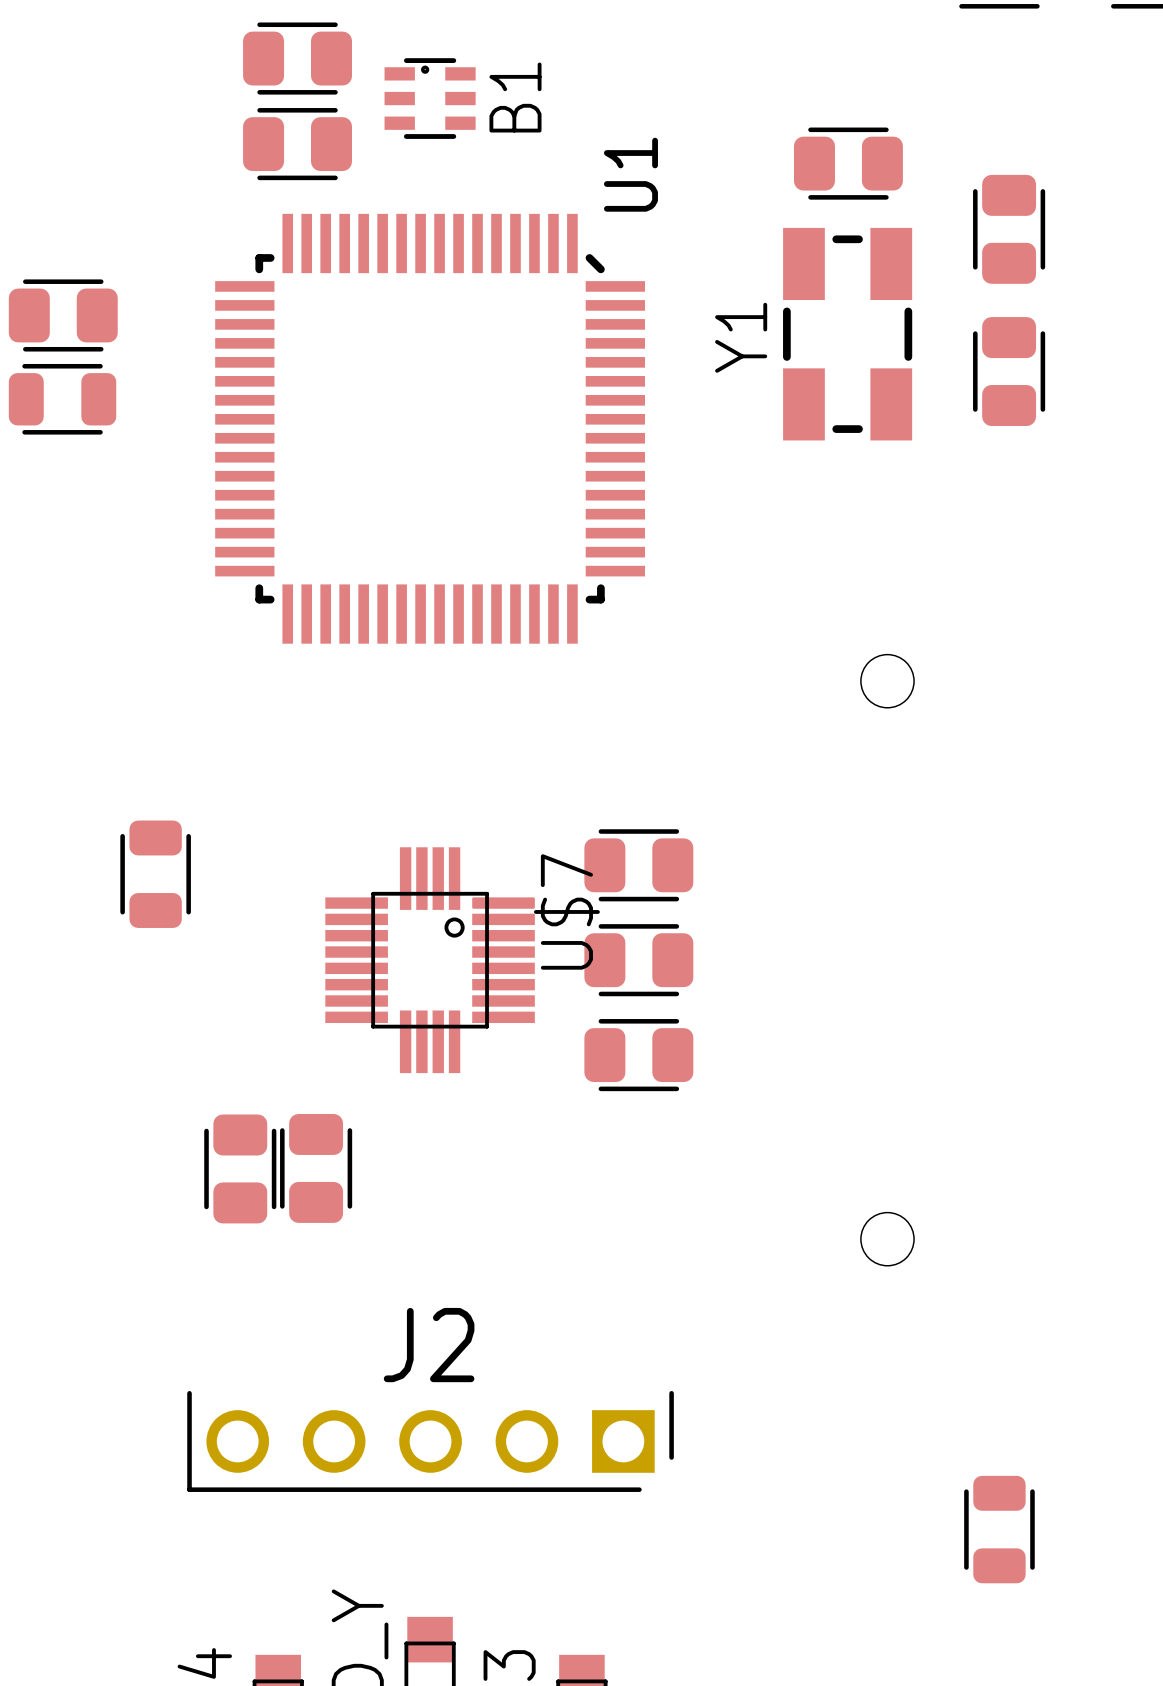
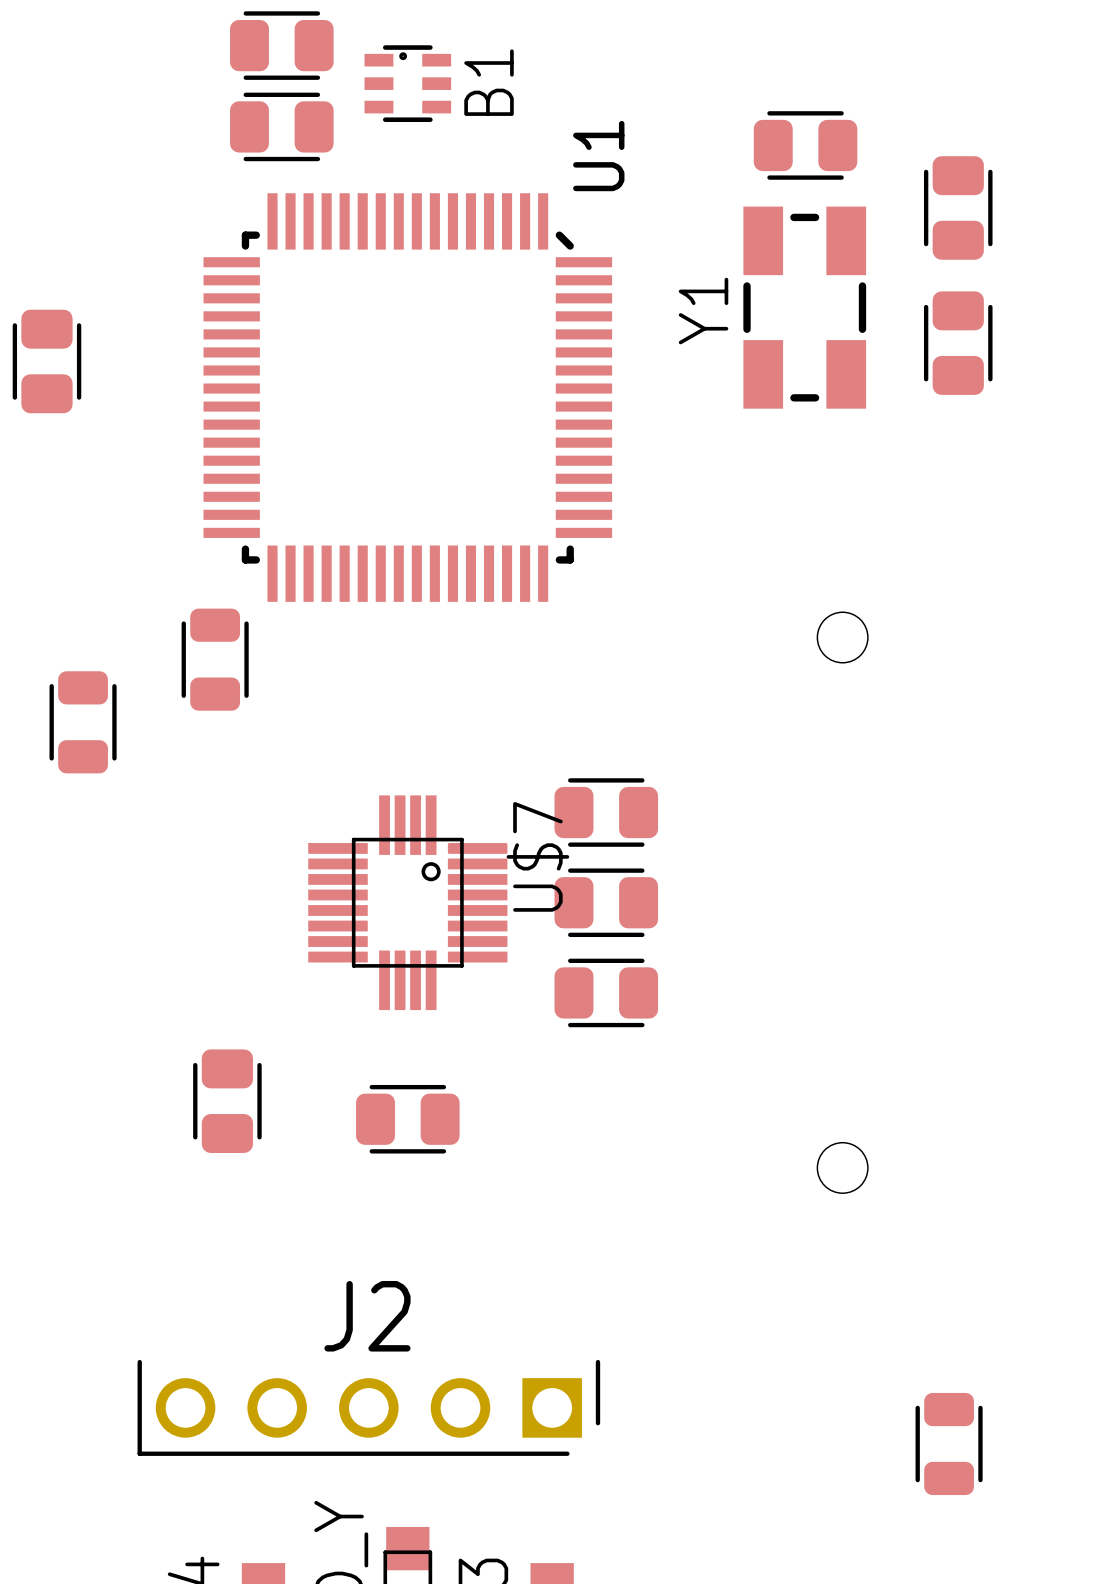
part: (63, 315) -> none
part footprint: [8, 363, 117, 435] -> [12, 309, 82, 414]
part: none -> (215, 659)
part: none -> (83, 722)
part: (155, 874) -> none
part rotation: 0° (316, 1168) -> 90° clockwise (407, 1119)
part position: (316, 1168) -> (407, 1119)
J2 position: (430, 1441) -> (368, 1407)

